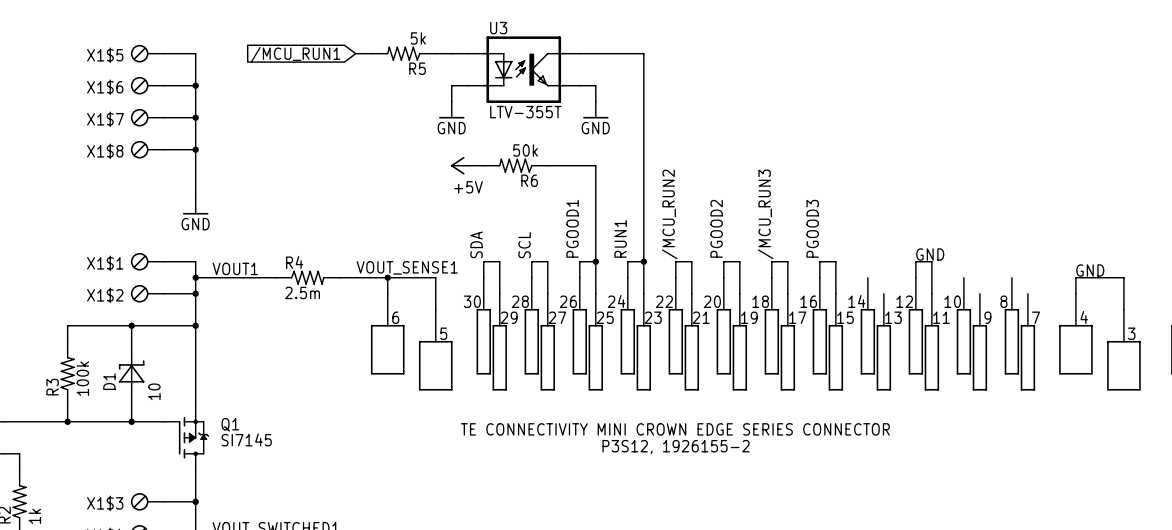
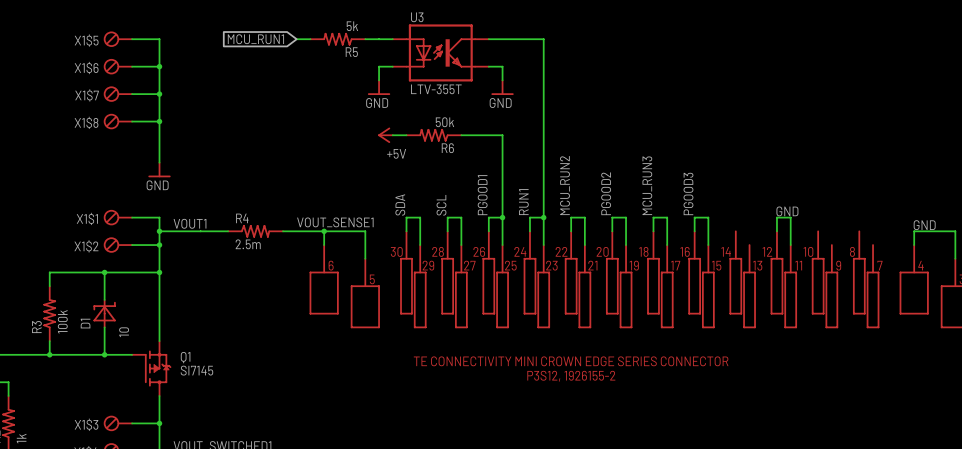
global label: /MCU_RUN1 (295, 54) -> MCU_RUN1 (255, 39)
label: /MCU_RUN2 (669, 214) -> MCU_RUN2 (564, 185)
label: /MCU_RUN3 (765, 214) -> MCU_RUN3 (647, 185)

